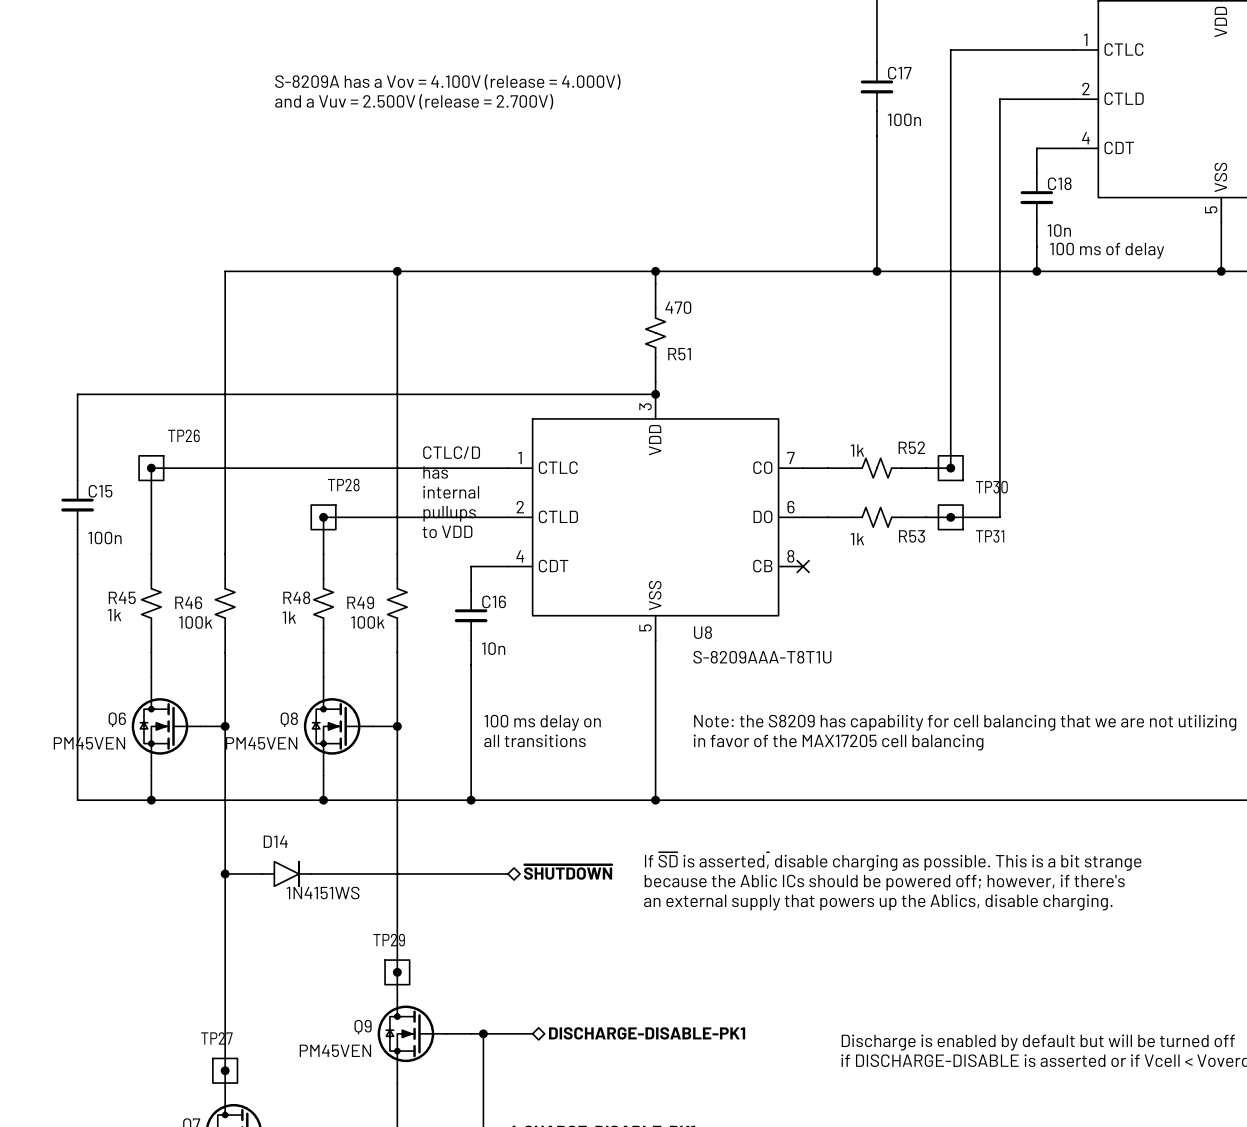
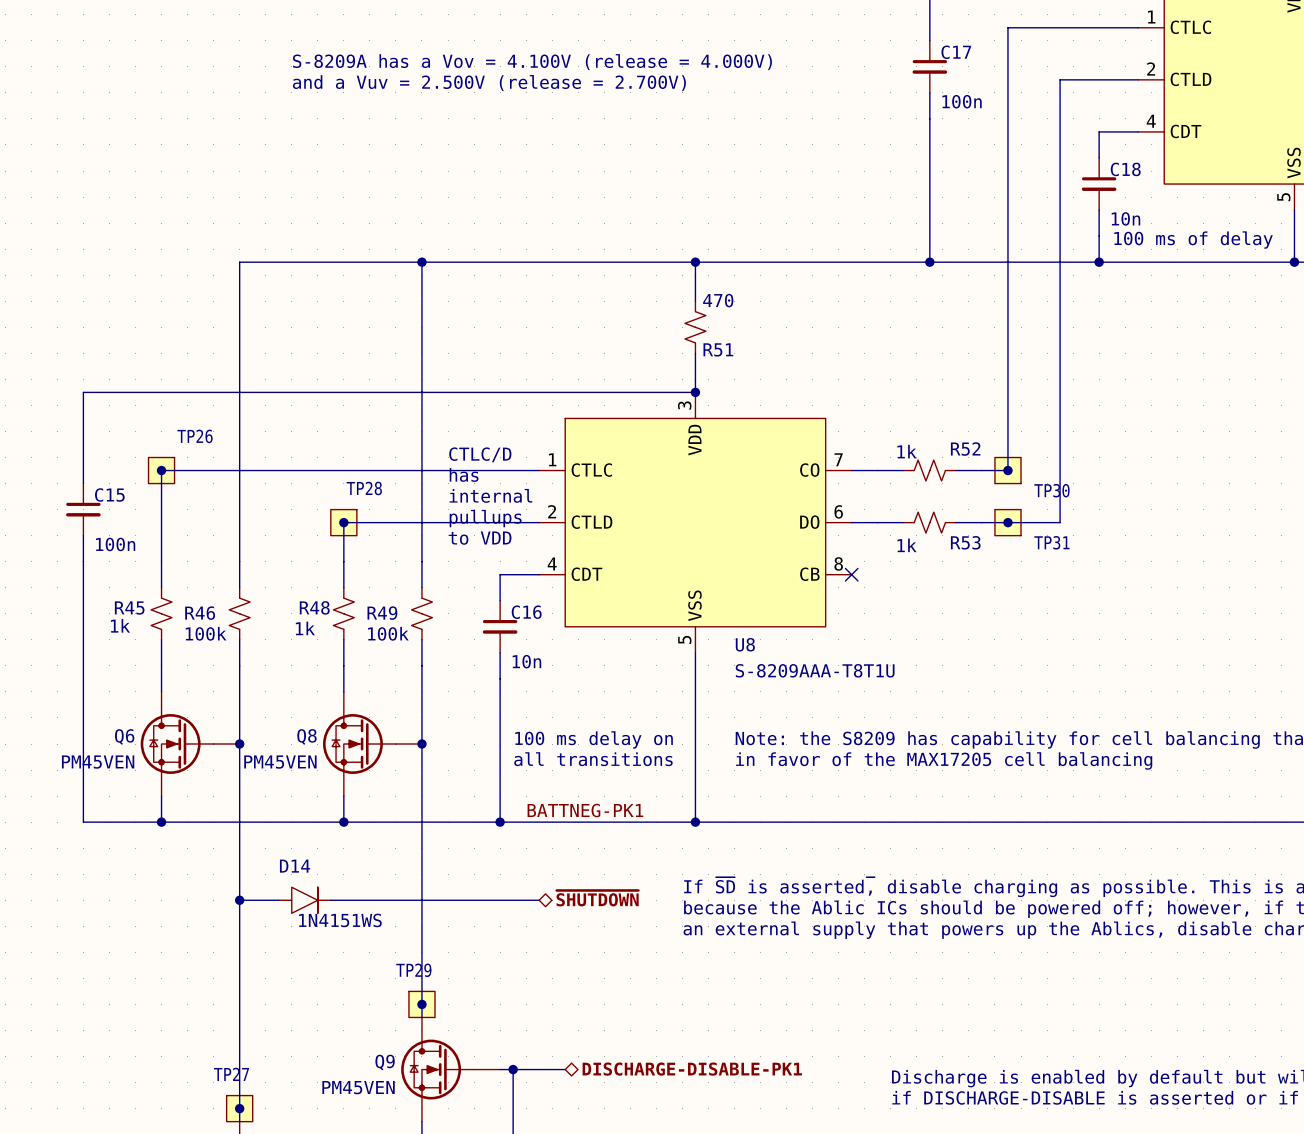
label: none -> BATTNEG-PK1 (585, 810)

